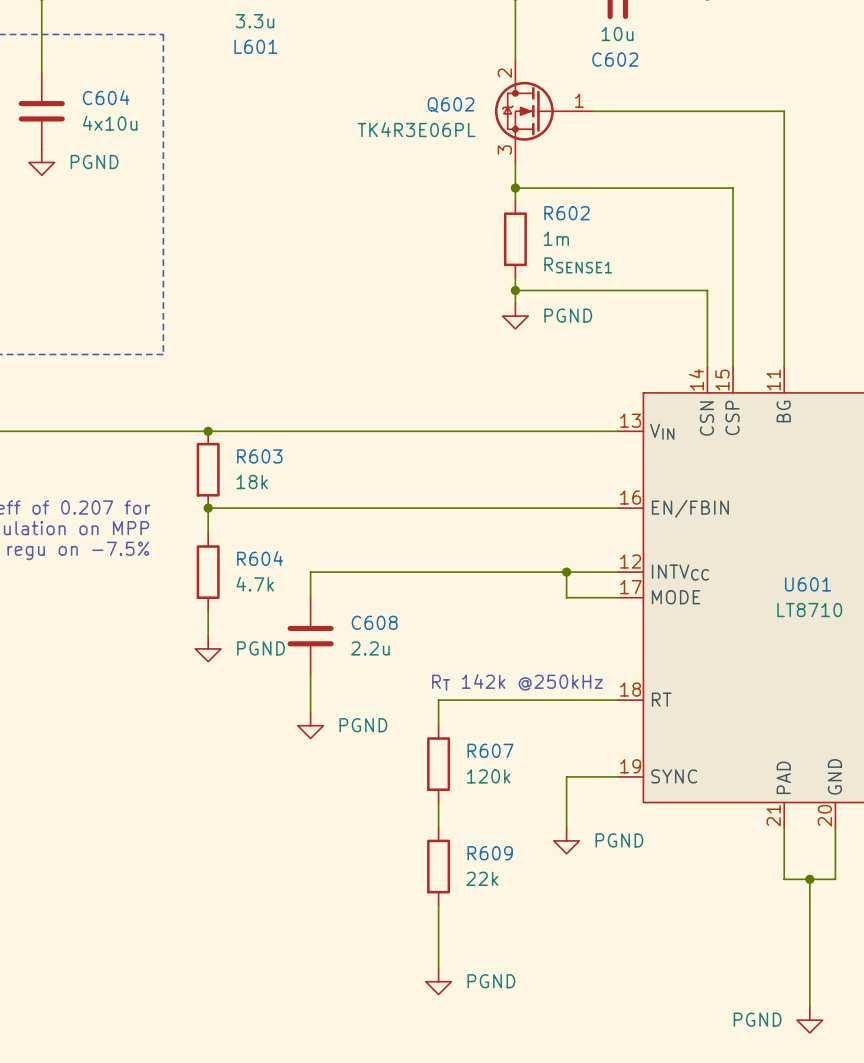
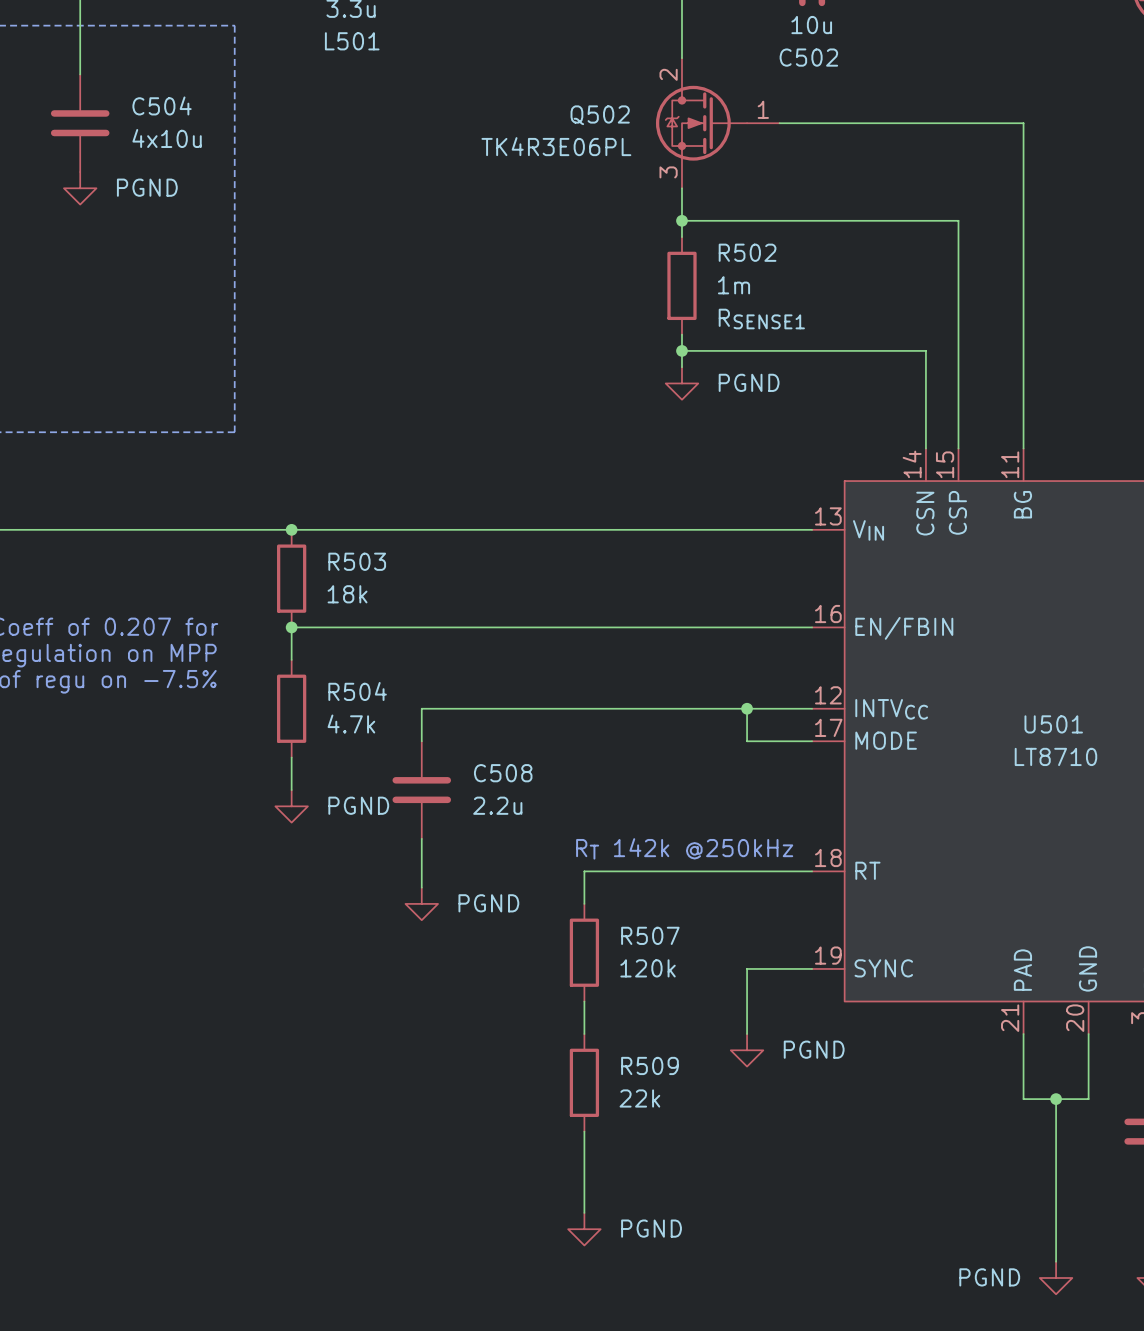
L601 name: L601 (255, 46) -> L501 (352, 41)
C602 name: C602 (615, 59) -> C502 (808, 57)
C604 name: C604 (106, 97) -> C504 (162, 105)
Q602 name: Q602 (451, 105) -> Q502 (600, 115)
R602 name: R602 (567, 213) -> R502 (747, 252)
R603 name: R603 (259, 456) -> R503 (357, 561)
R604 name: R604 (260, 558) -> R504 (357, 691)
U601 name: U601 (807, 584) -> U501 (1053, 724)
C608 name: C608 (374, 622) -> C508 (503, 773)
R607 name: R607 (490, 750) -> R507 (650, 935)
R609 name: R609 (490, 853) -> R509 (649, 1065)

